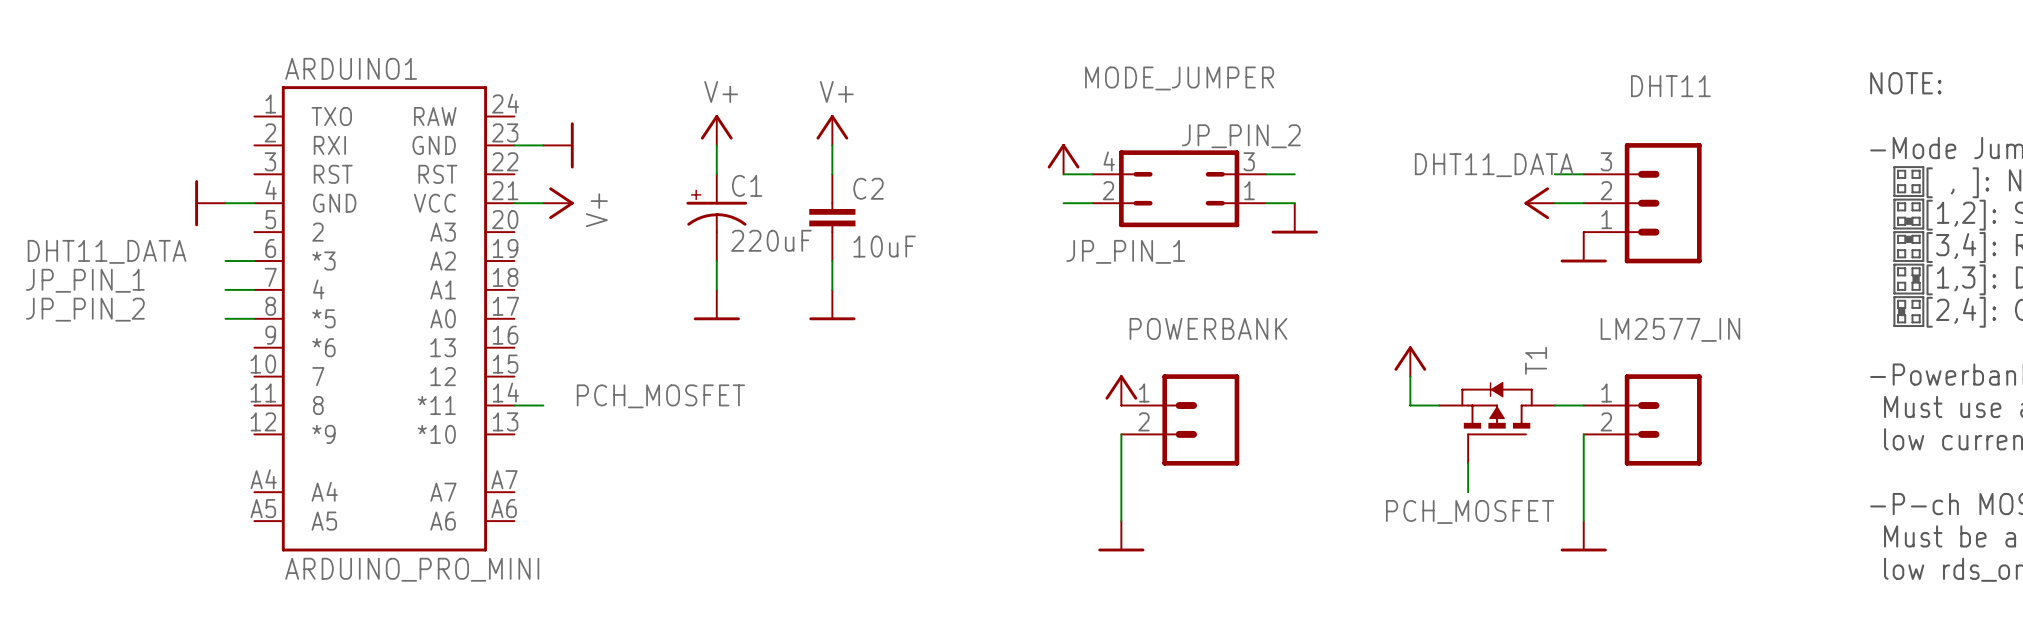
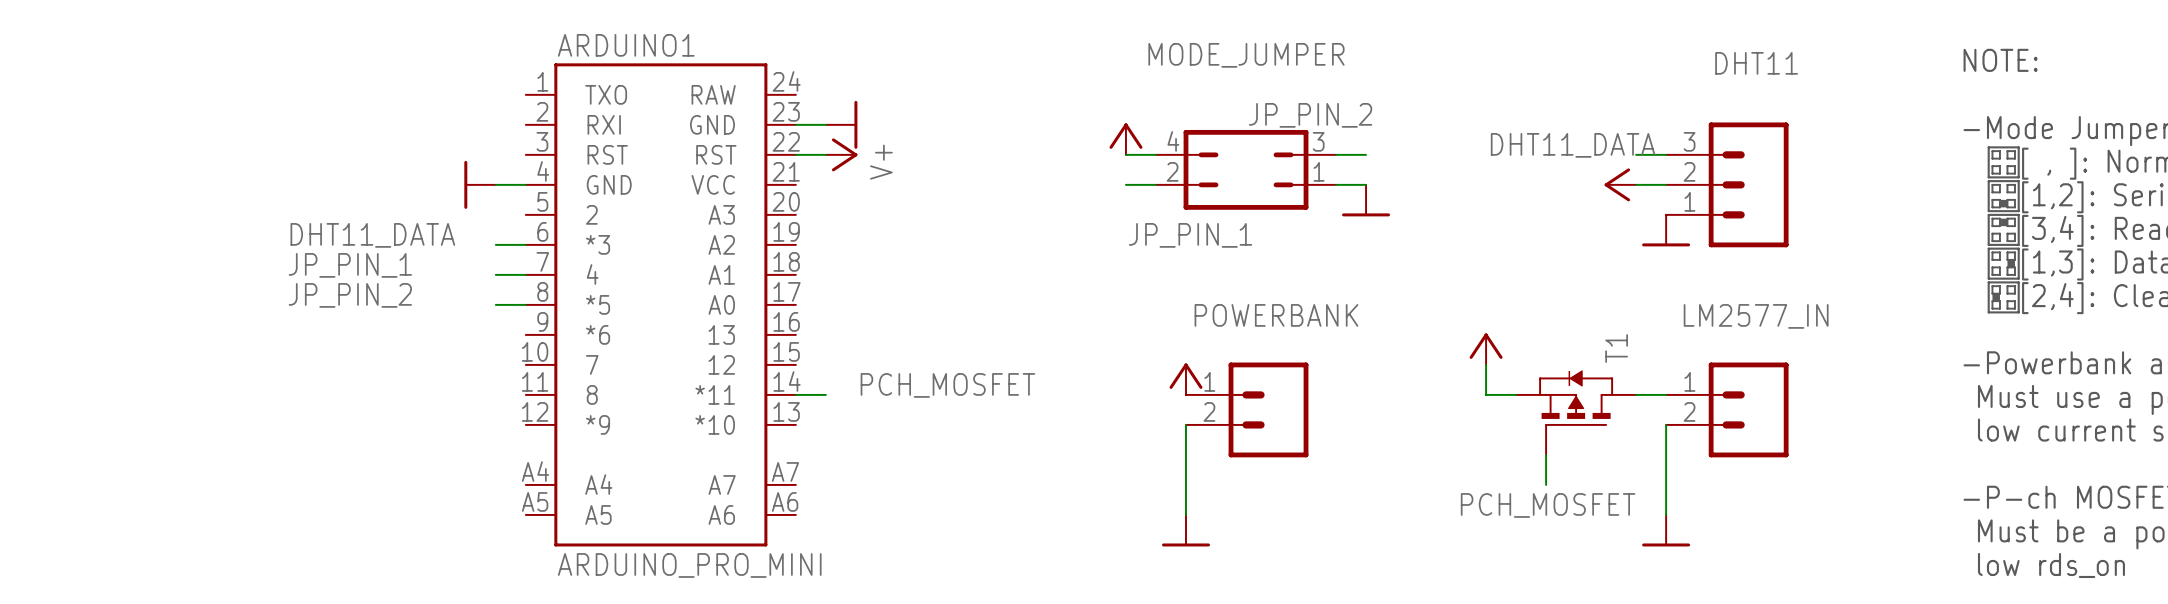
power symbol: V+ (716, 130) -> none
power symbol: V+ (832, 130) -> none
wire: (514, 145) (543, 145) -> (795, 124) (825, 124)
power symbol: (558, 145) -> none
power symbol: none -> (841, 124)
wire: (832, 145) (832, 174) -> none
power symbol: none -> V+ (841, 154)
power symbol: (210, 203) -> none
wire: (225, 203) (254, 203) -> (495, 184) (525, 184)
power symbol: none -> (480, 184)
wire: (514, 203) (543, 203) -> (795, 154) (825, 154)
power symbol: V+ (558, 203) -> none
C1: 220uF (716, 217) -> none
C2: 10uF (832, 217) -> none
label position: DHT11_DATA (107, 251) -> DHT11_DATA (372, 235)
wire: (225, 261) (254, 261) -> (495, 244) (525, 244)
wire: (832, 261) (832, 289) -> none
label position: JP_PIN_1 (85, 280) -> JP_PIN_1 (350, 265)
wire: (225, 289) (254, 289) -> (495, 274) (525, 274)
power symbol: (716, 305) -> none
power symbol: (832, 305) -> none
label position: JP_PIN_2 (85, 309) -> JP_PIN_2 (350, 295)
wire: (225, 318) (254, 318) -> (495, 304) (525, 304)
ARDUINO1 position: (384, 318) -> (660, 304)
label position: PCH_MOSFET (660, 396) -> PCH_MOSFET (947, 385)
wire: (514, 405) (543, 405) -> (795, 394) (825, 394)

